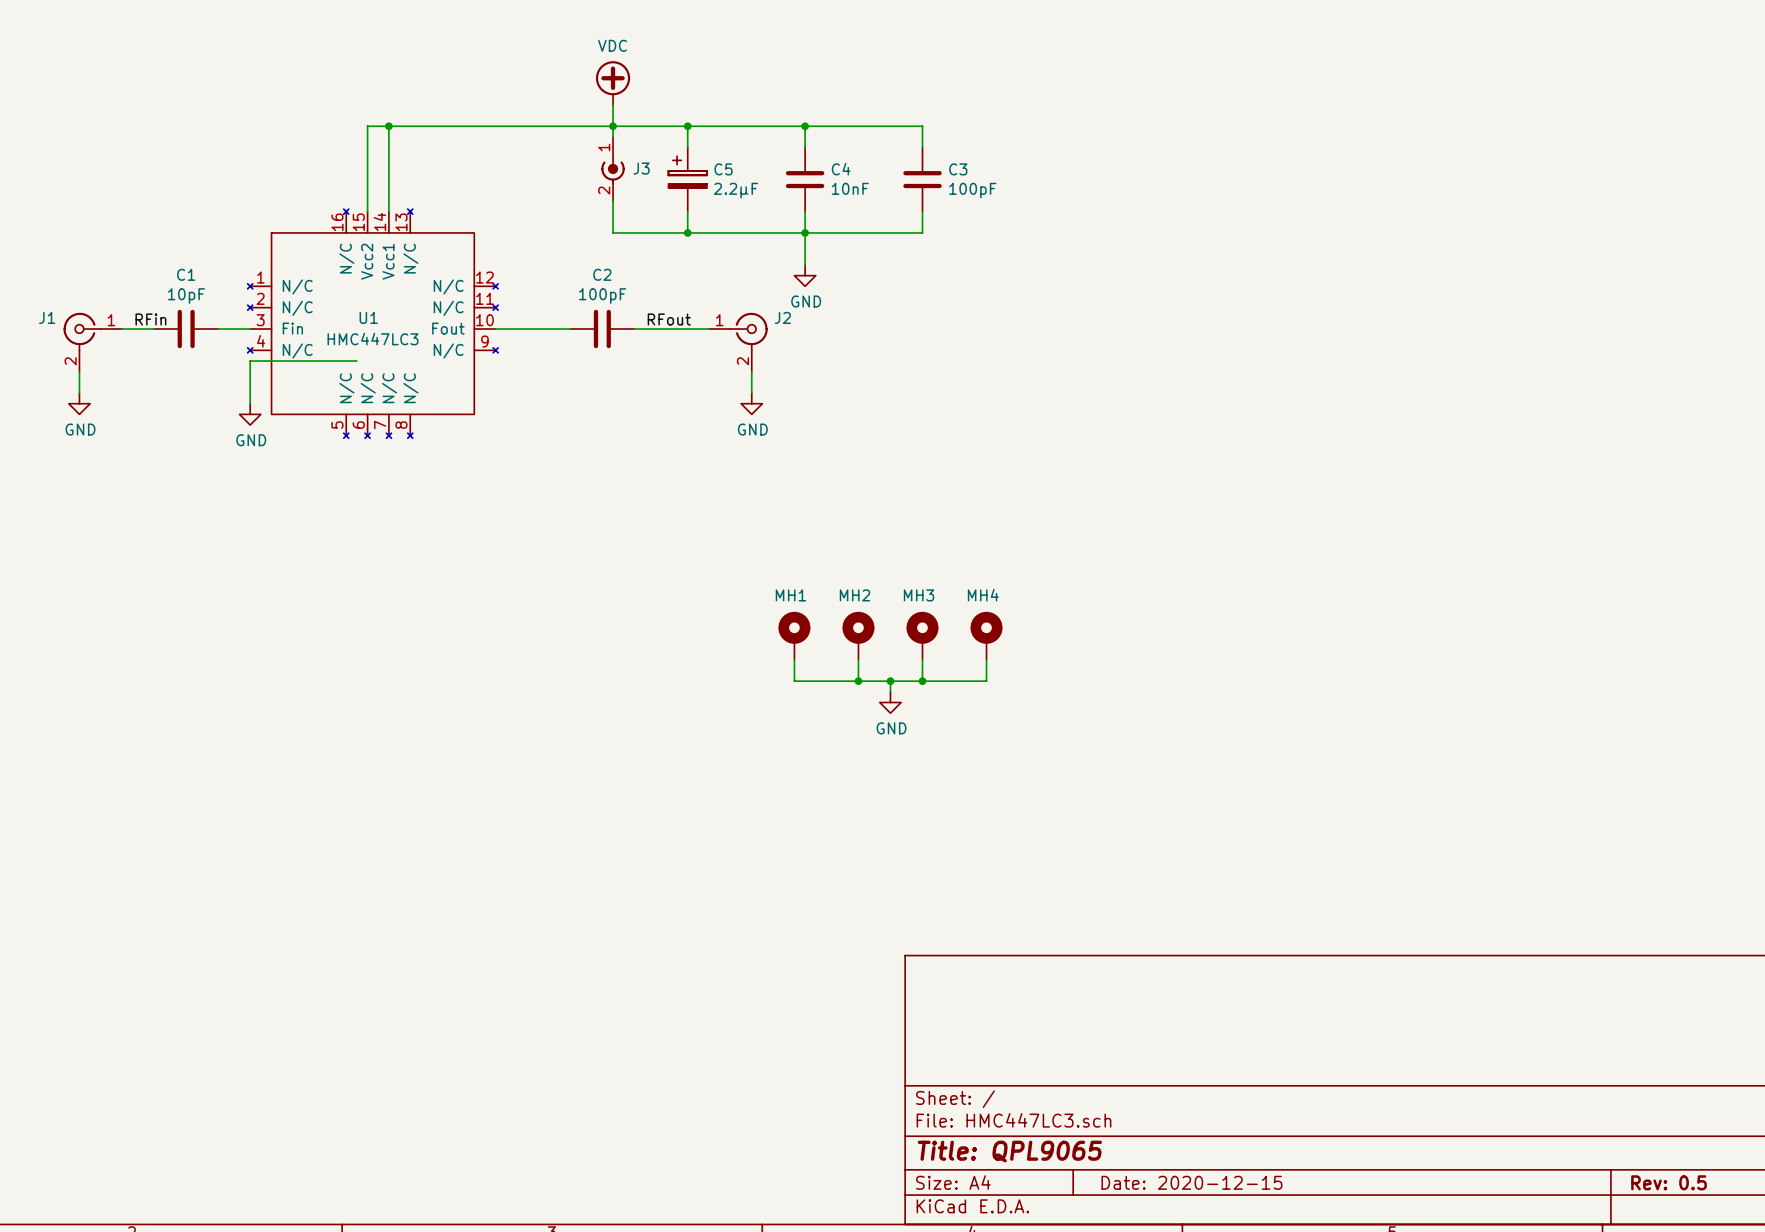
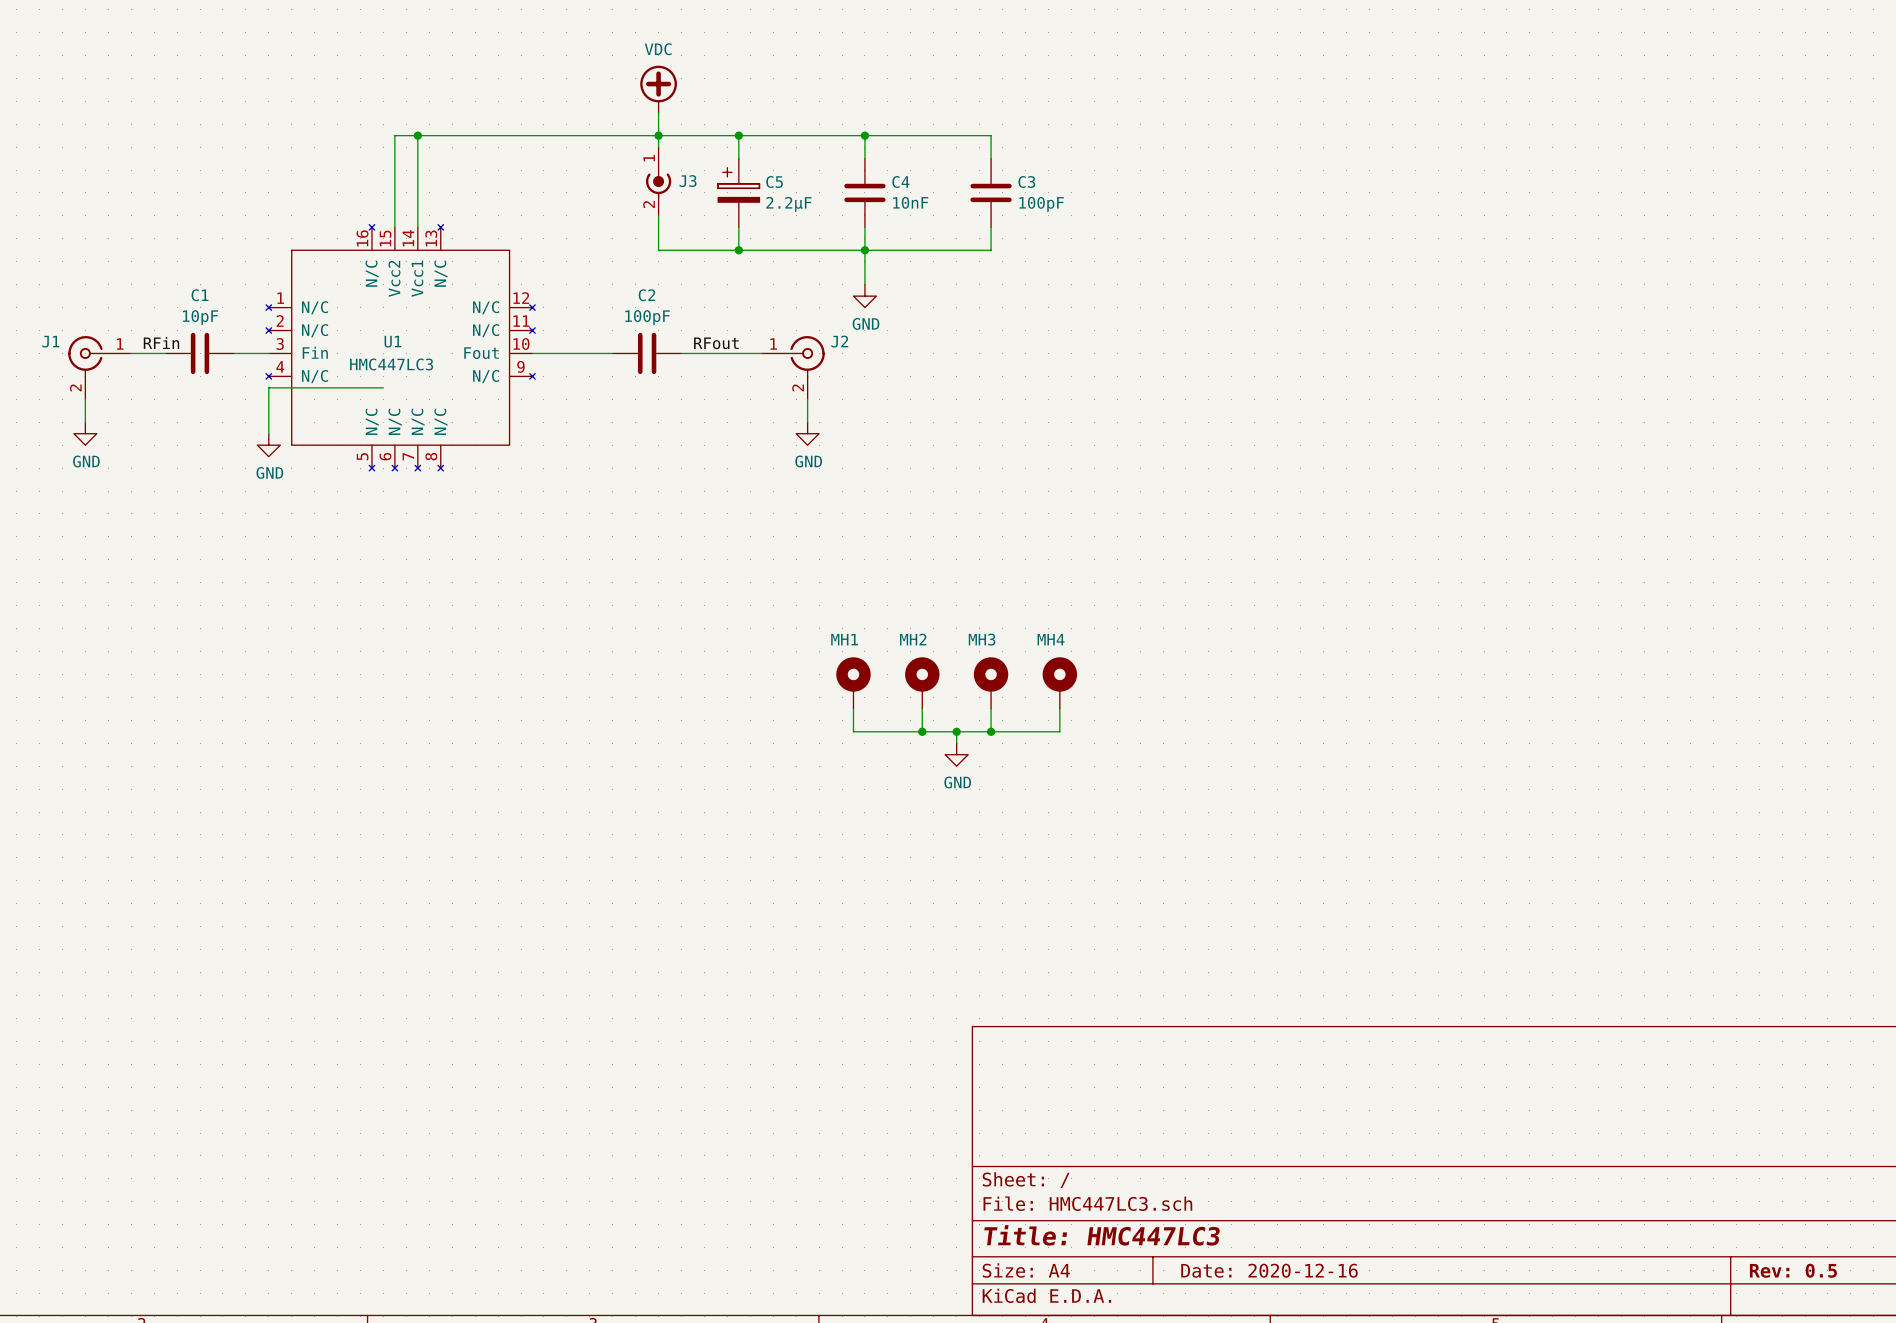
title block: Title: QPL9065 (1009, 1151) -> Title: HMC447LC3 (1102, 1235)
title block: Date: 2020-12-15 (1191, 1182) -> Date: 2020-12-16 (1269, 1270)

